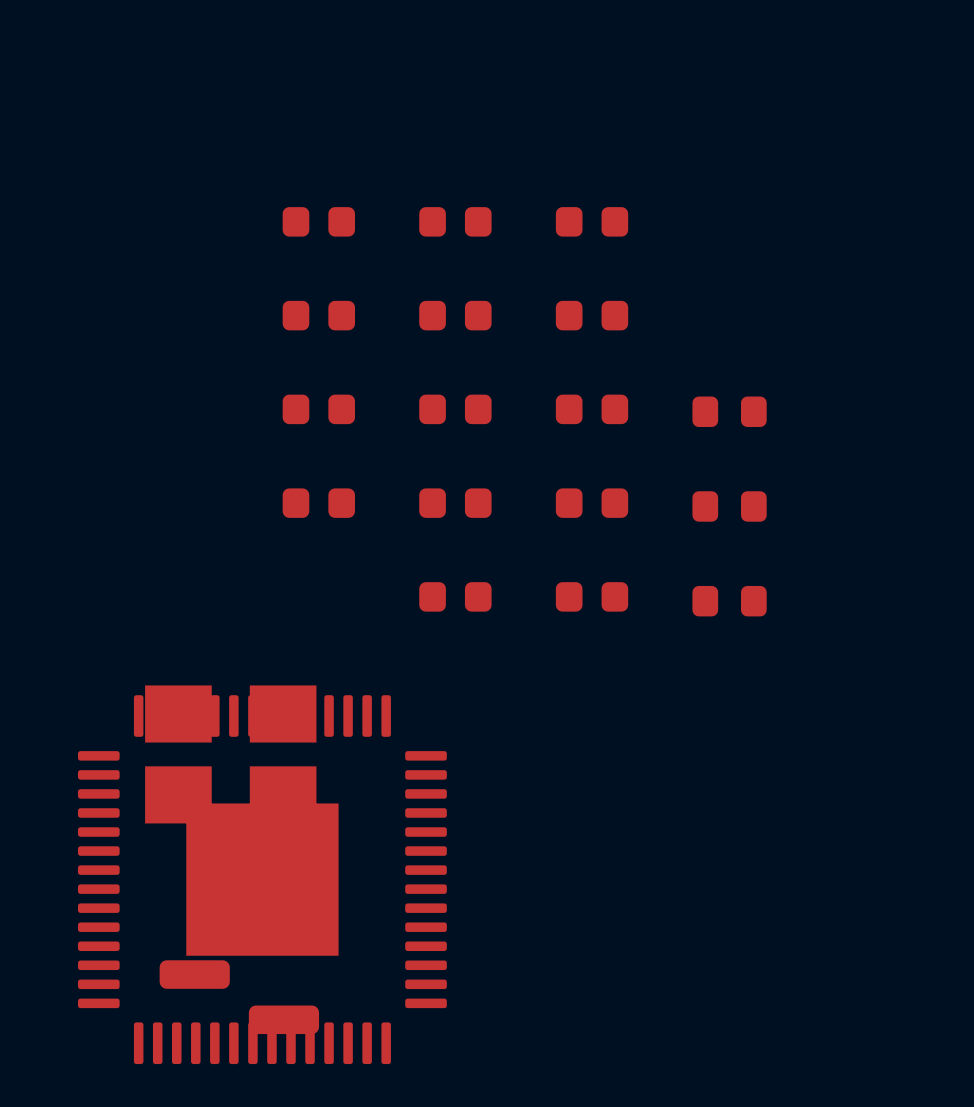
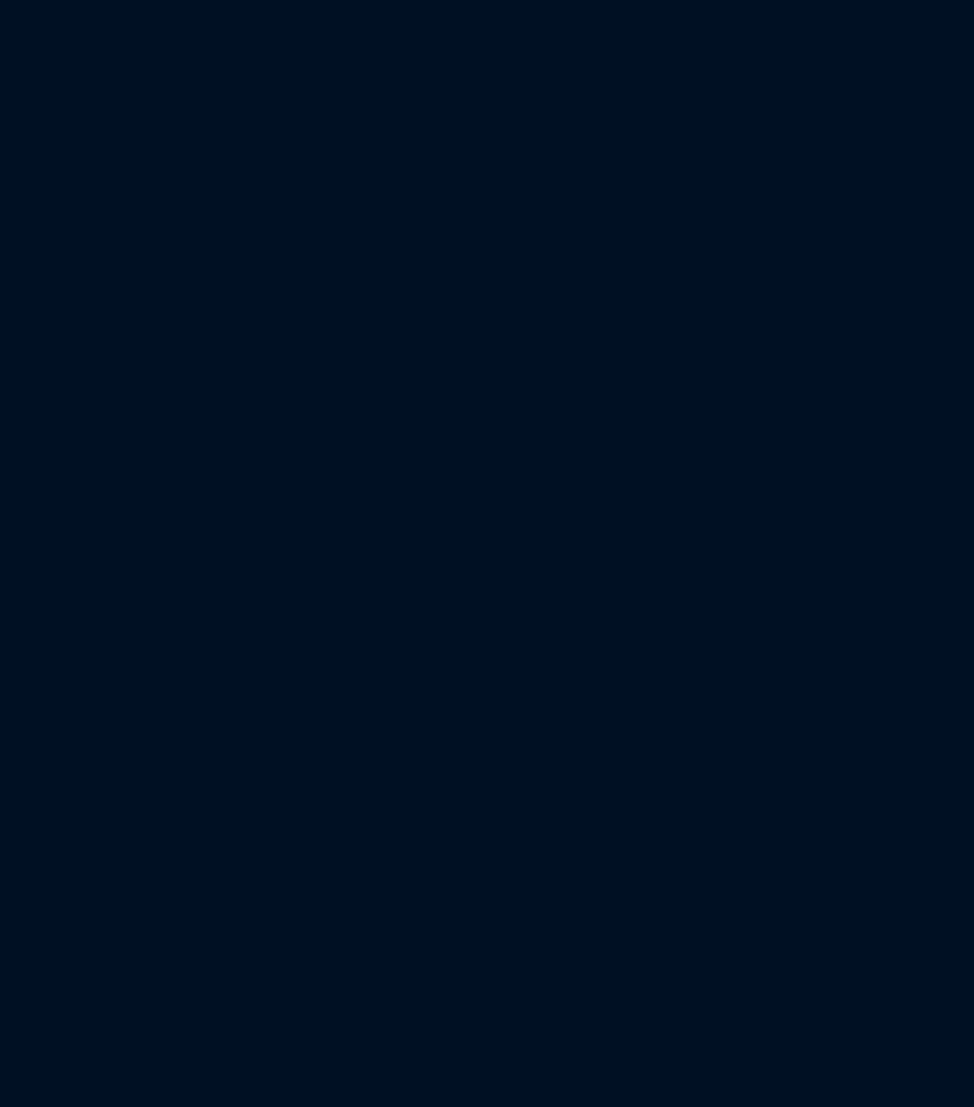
part: (318, 221) -> none
part: (455, 221) -> none
part: (592, 221) -> none
part: (318, 315) -> none
part: (455, 315) -> none
part: (592, 315) -> none
part: (318, 409) -> none
part: (455, 409) -> none
part: (592, 409) -> none
part: (729, 411) -> none
part: (318, 503) -> none
part: (455, 503) -> none
part: (592, 503) -> none
part: (729, 506) -> none
part: (455, 596) -> none
part: (592, 596) -> none
part: (729, 601) -> none
part: (230, 754) -> none
part: (262, 879) -> none
part: (239, 974) -> none

